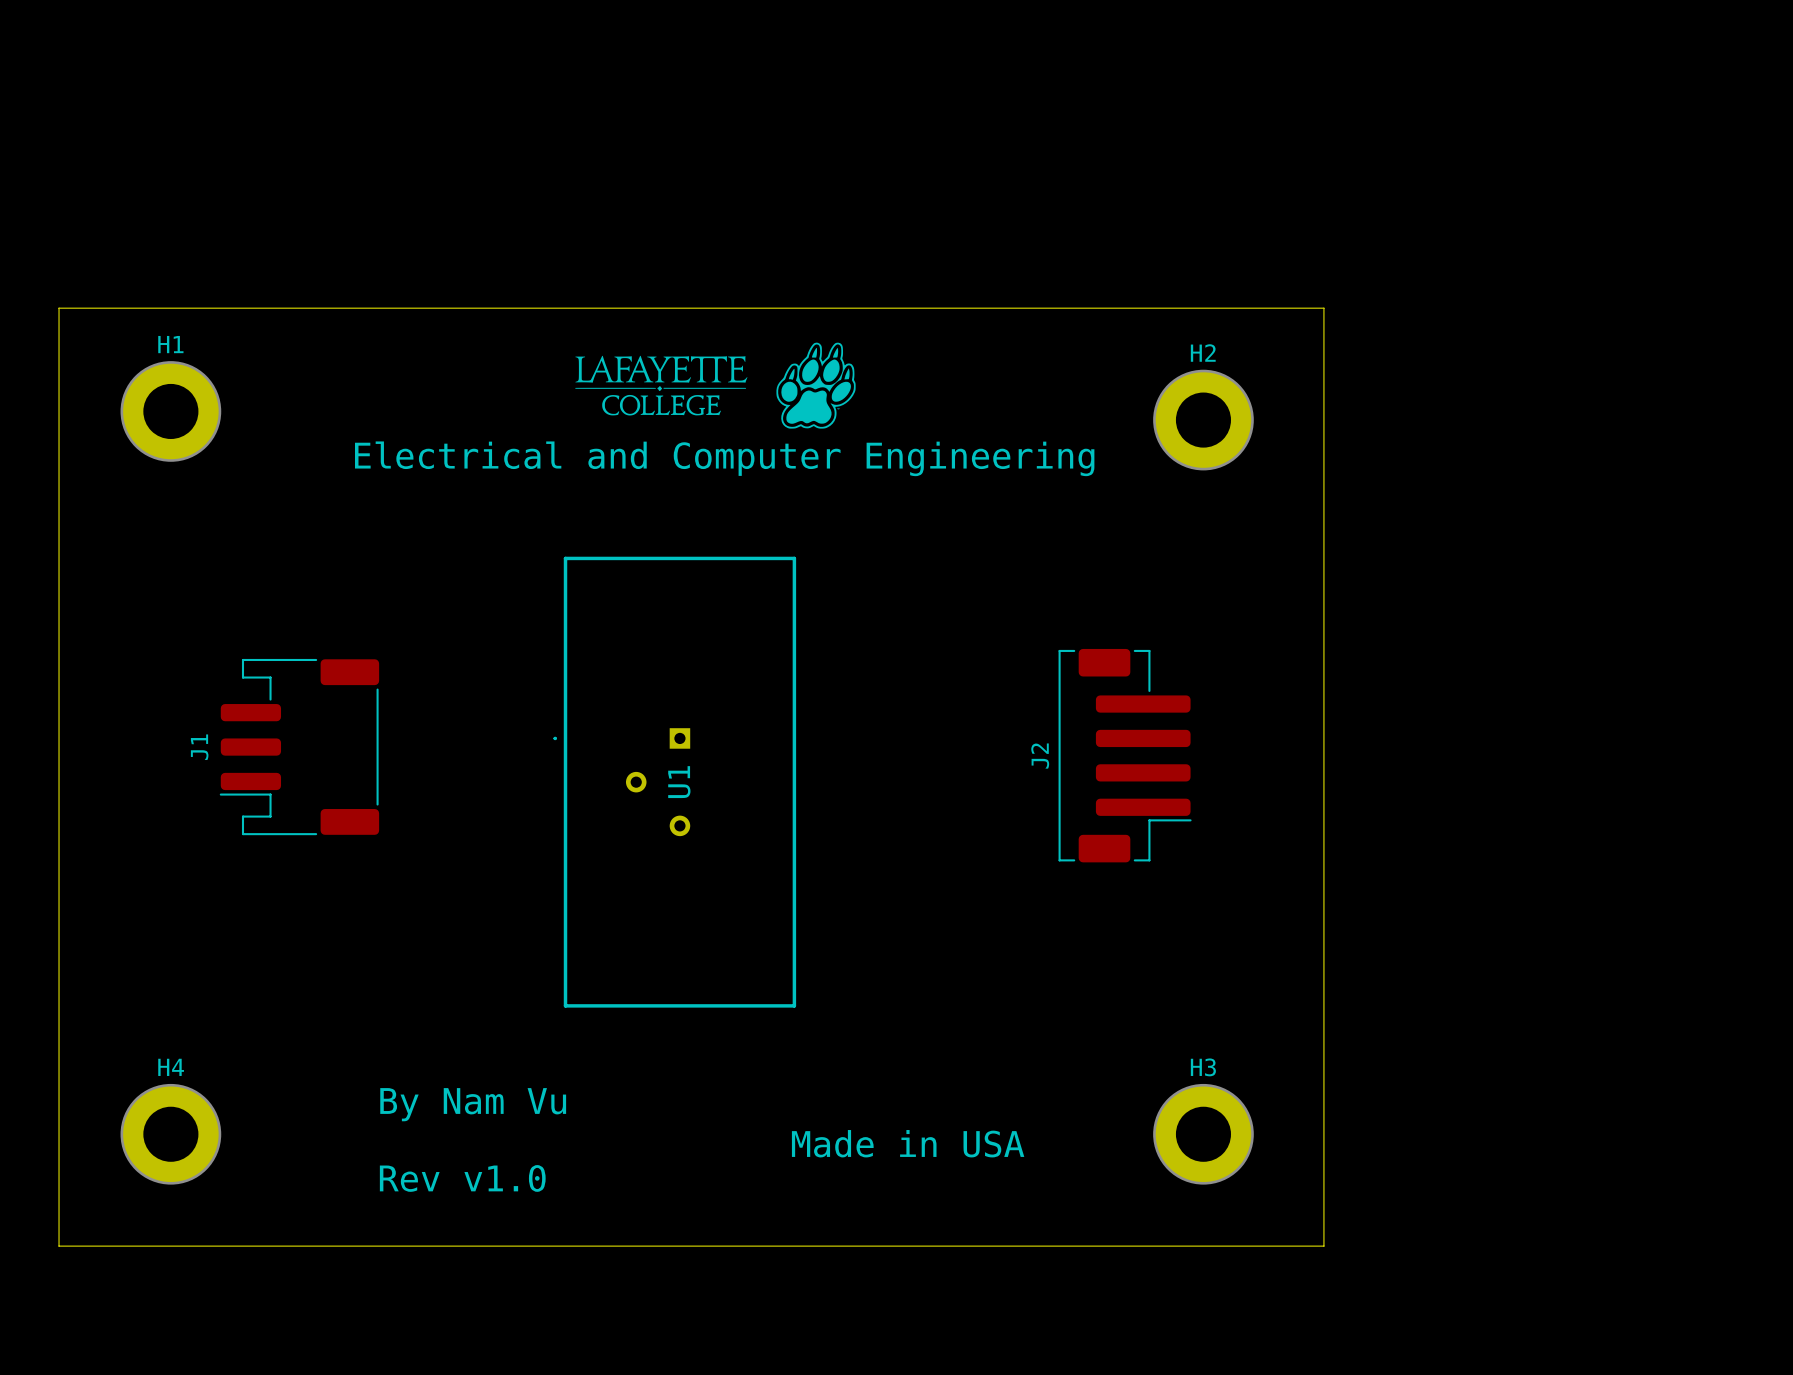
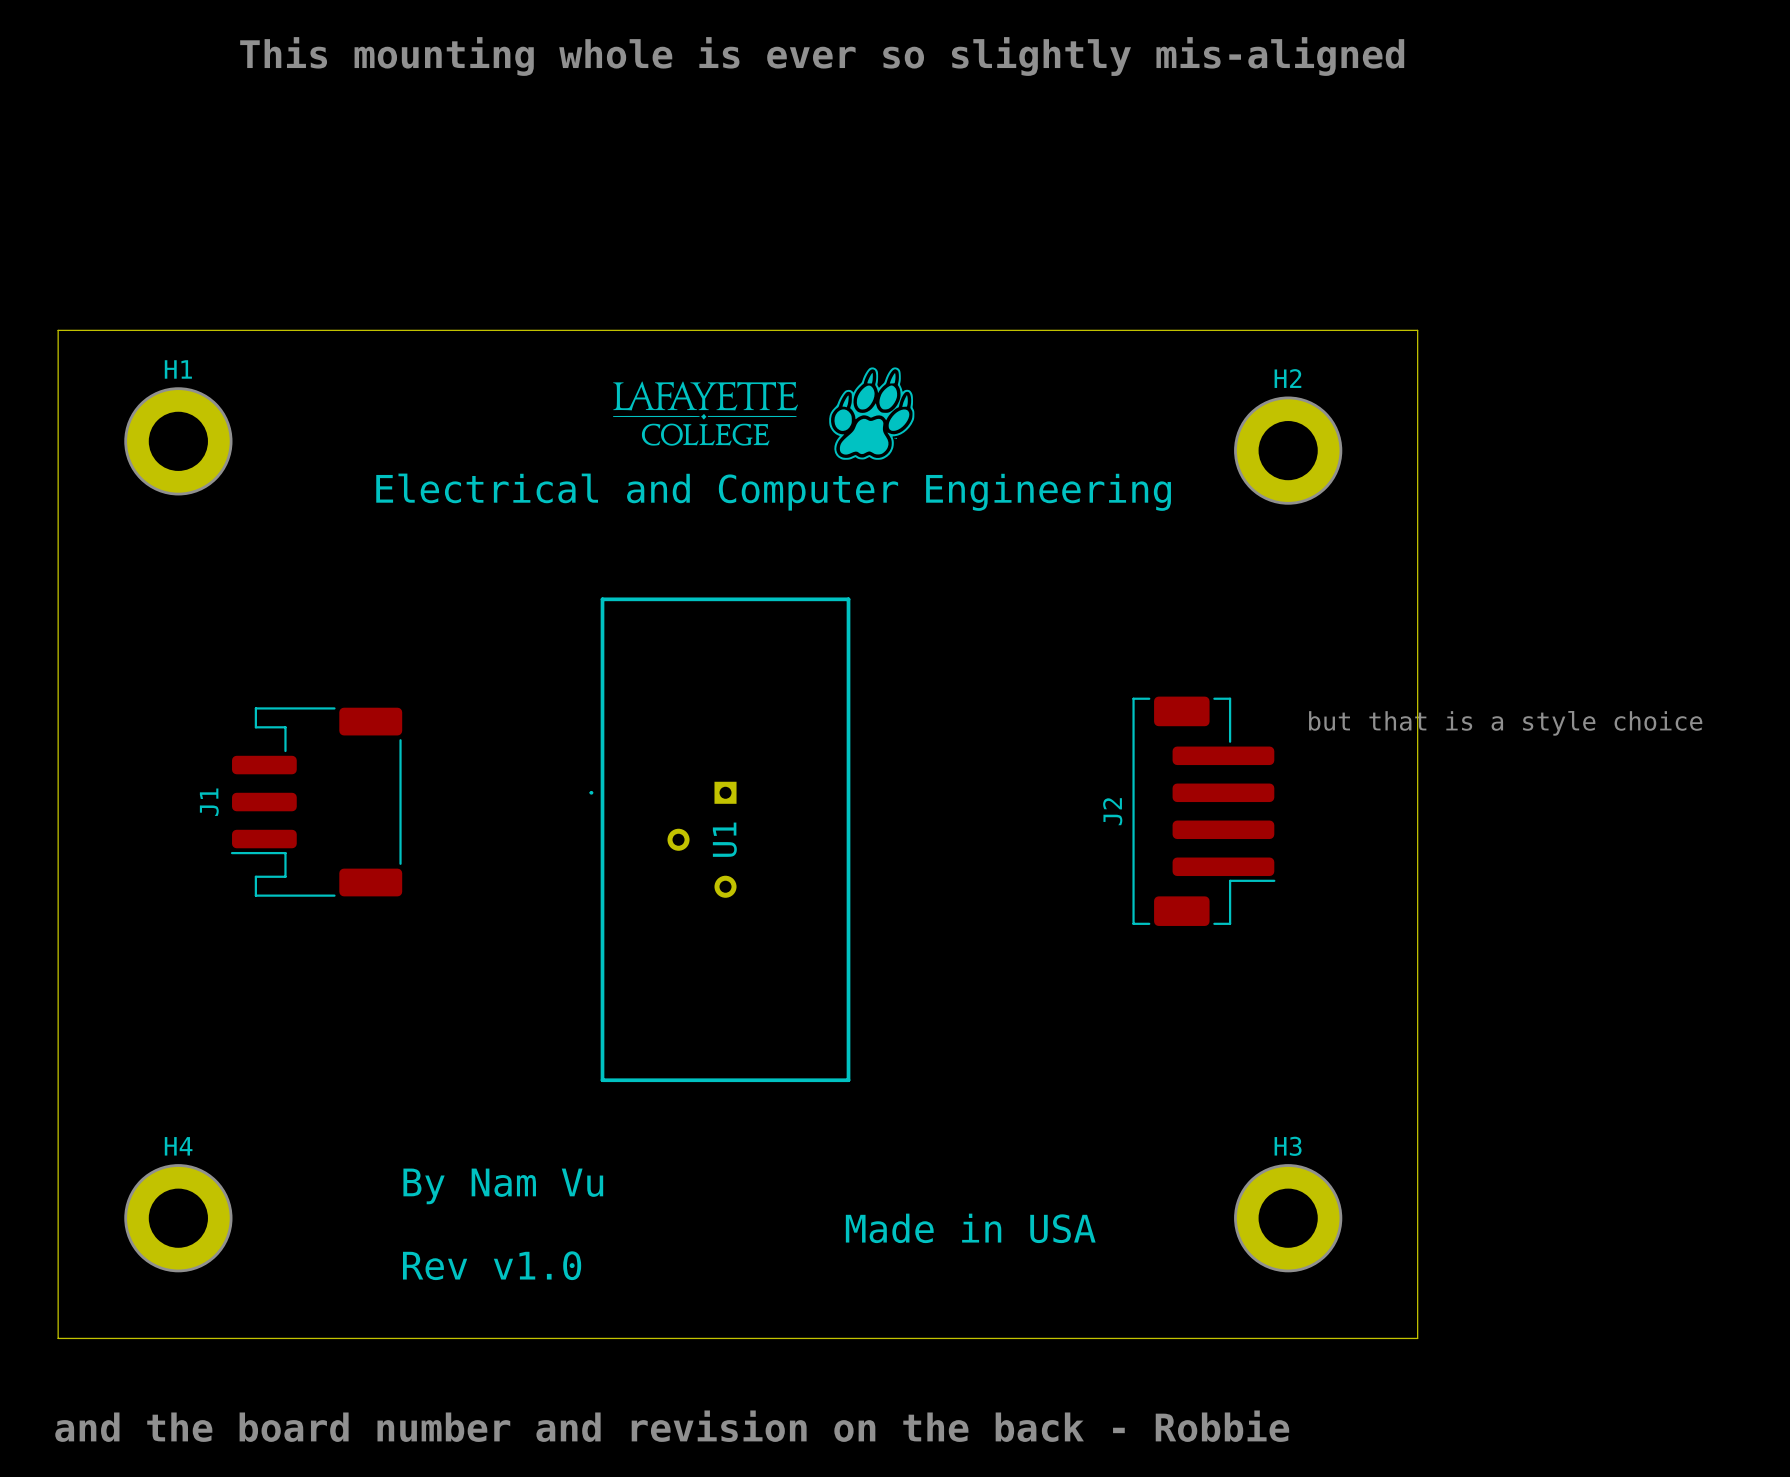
text: none -> This mounting whole is ever so slightly mis-aligned (822, 56)
text: none -> but that is a style choice (1505, 723)
text: none -> and the board number and revision on the back - Robbie (672, 1426)

